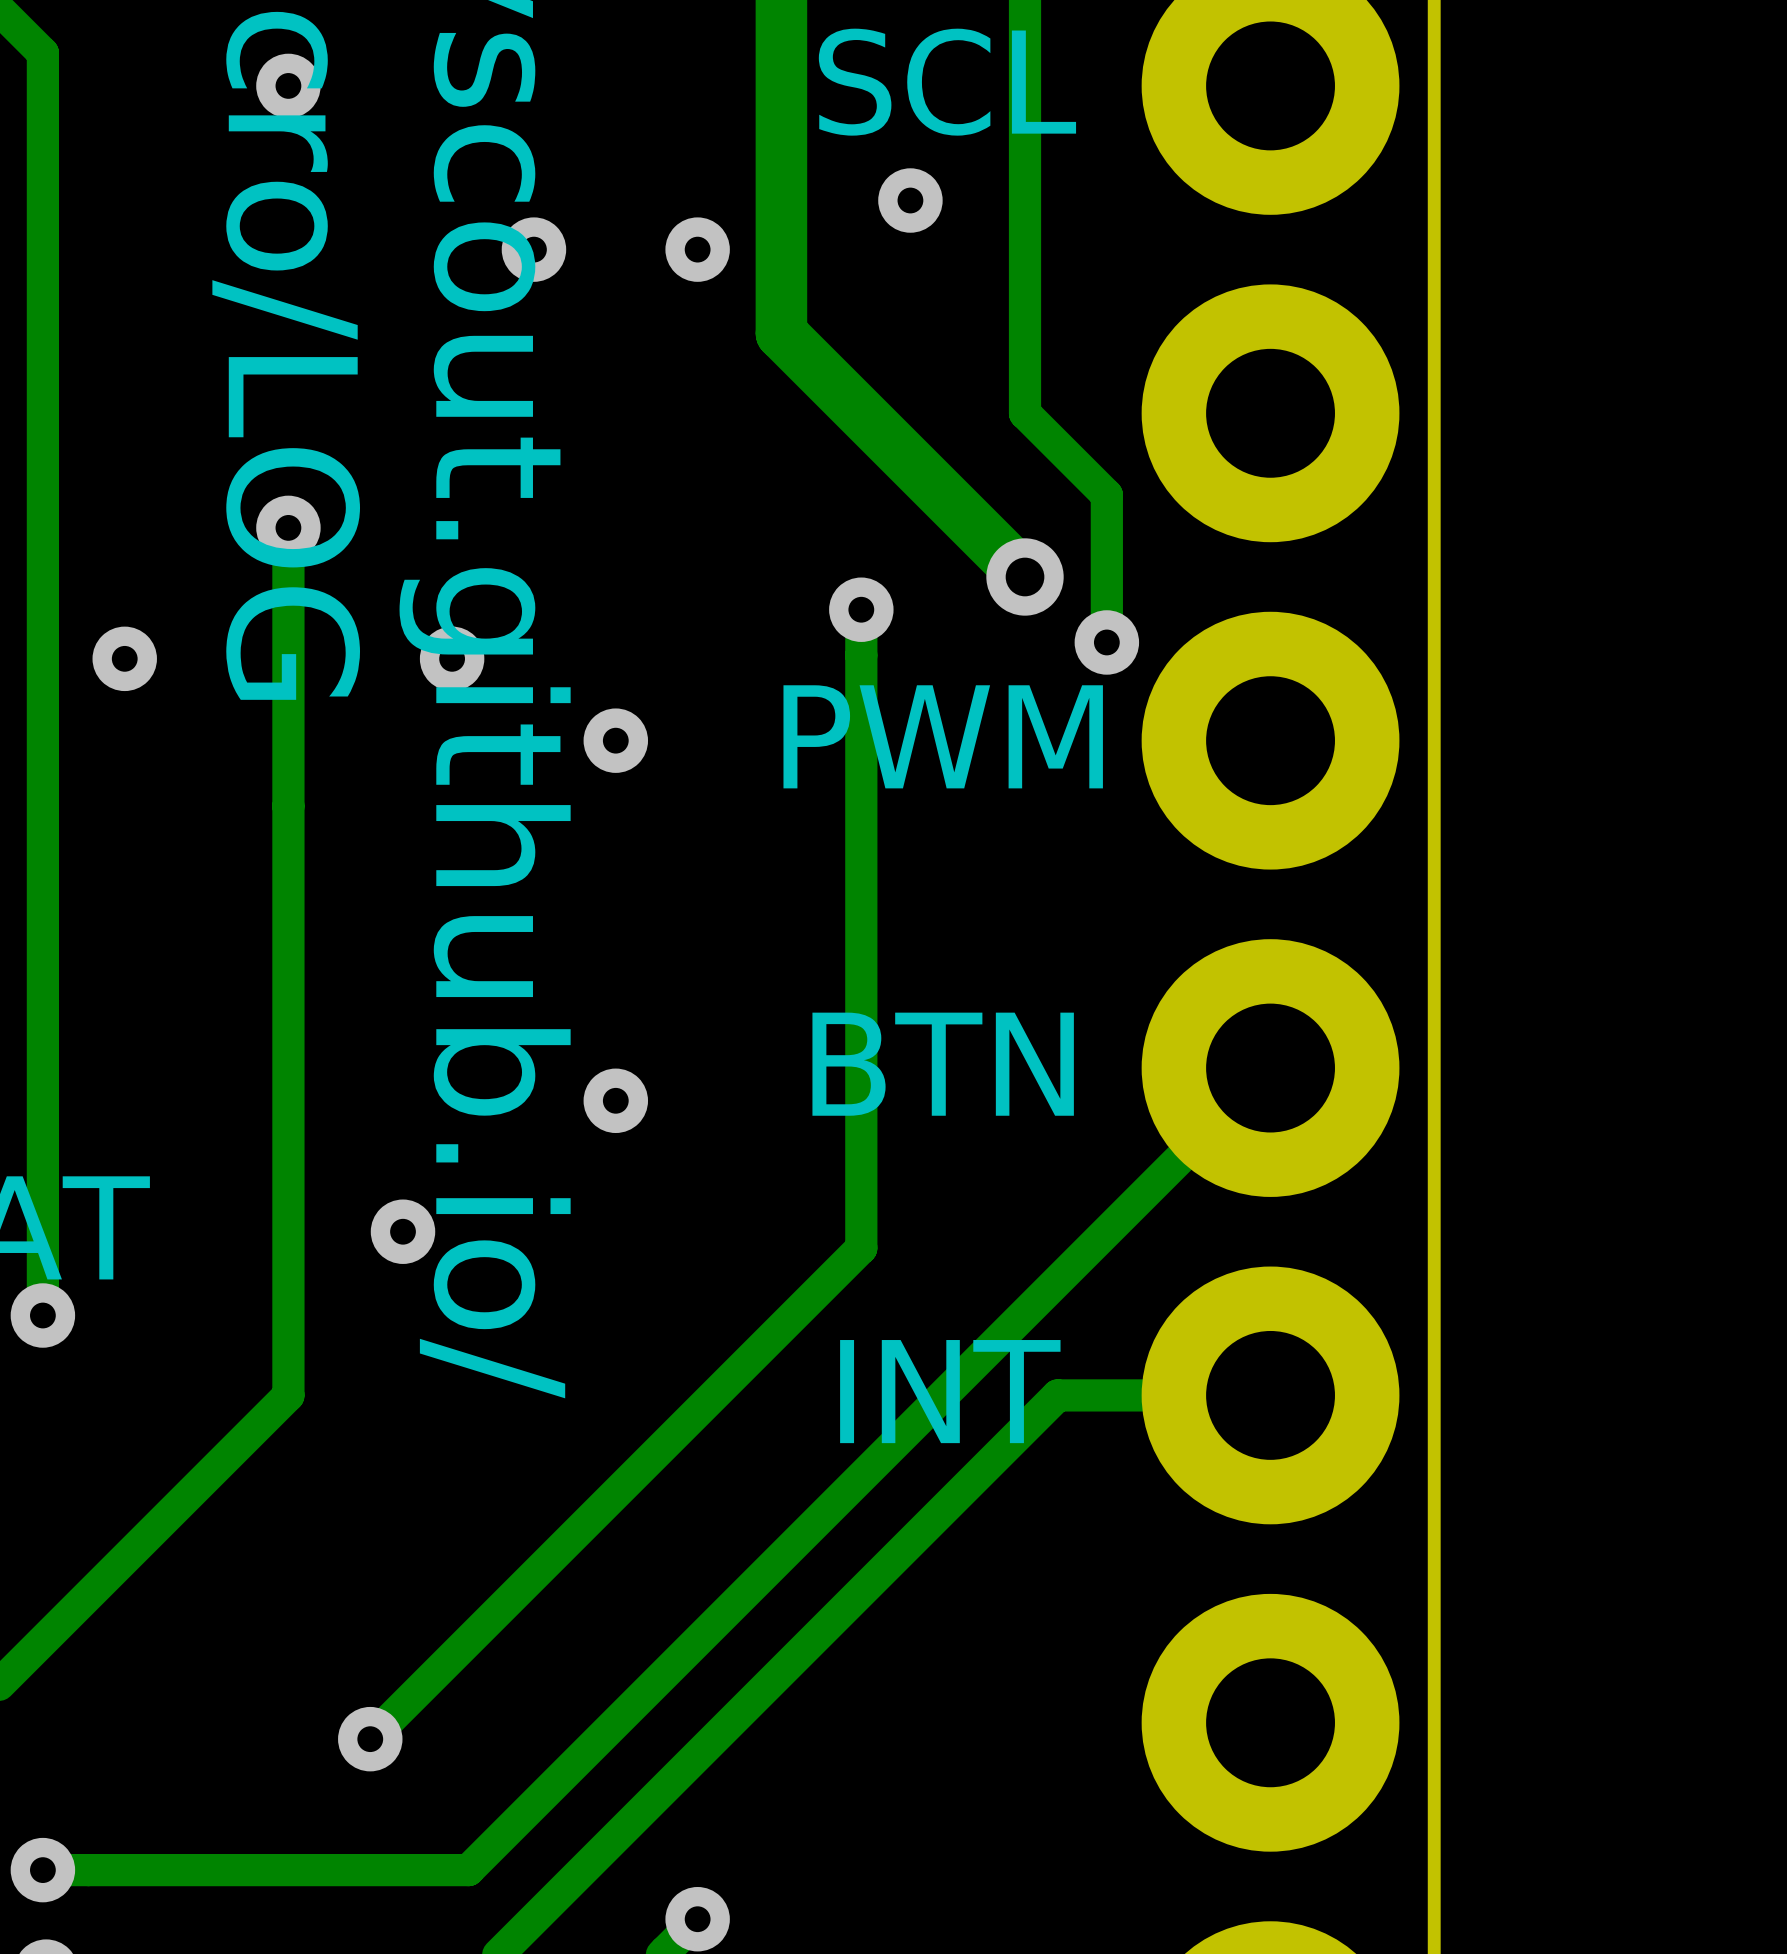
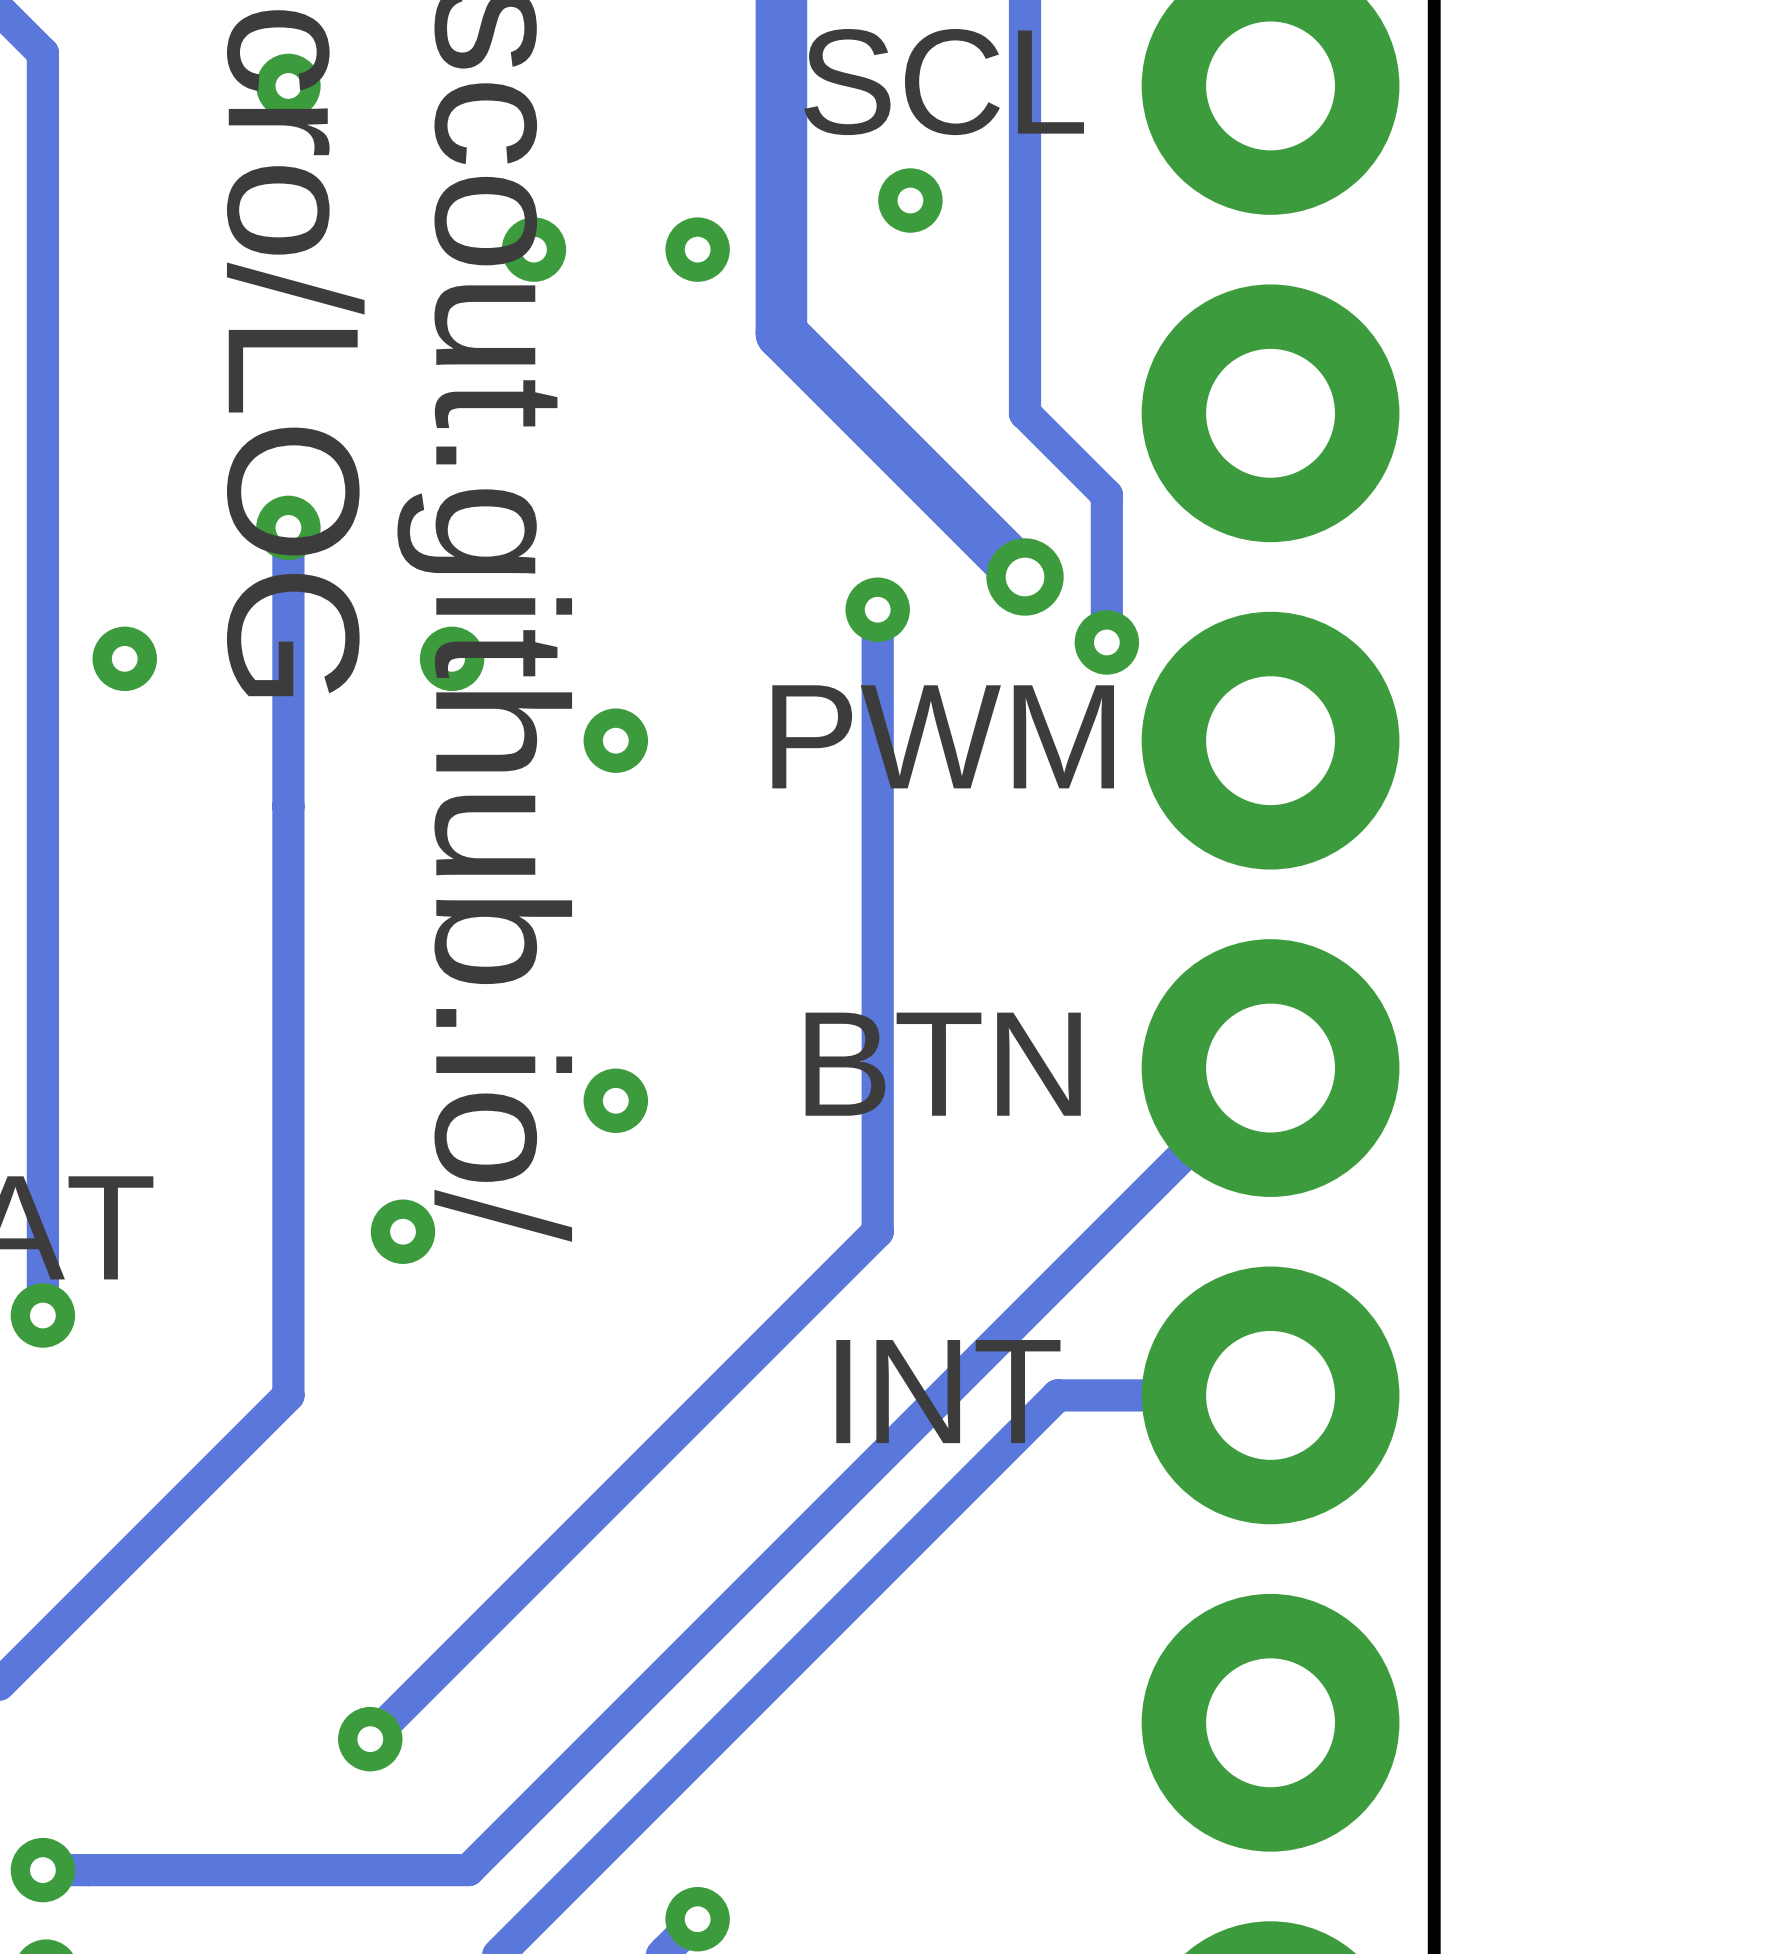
track: (861, 609) (861, 1248) -> (877, 609) (877, 1231) (861, 1248)
via position: (861, 609) -> (877, 609)

